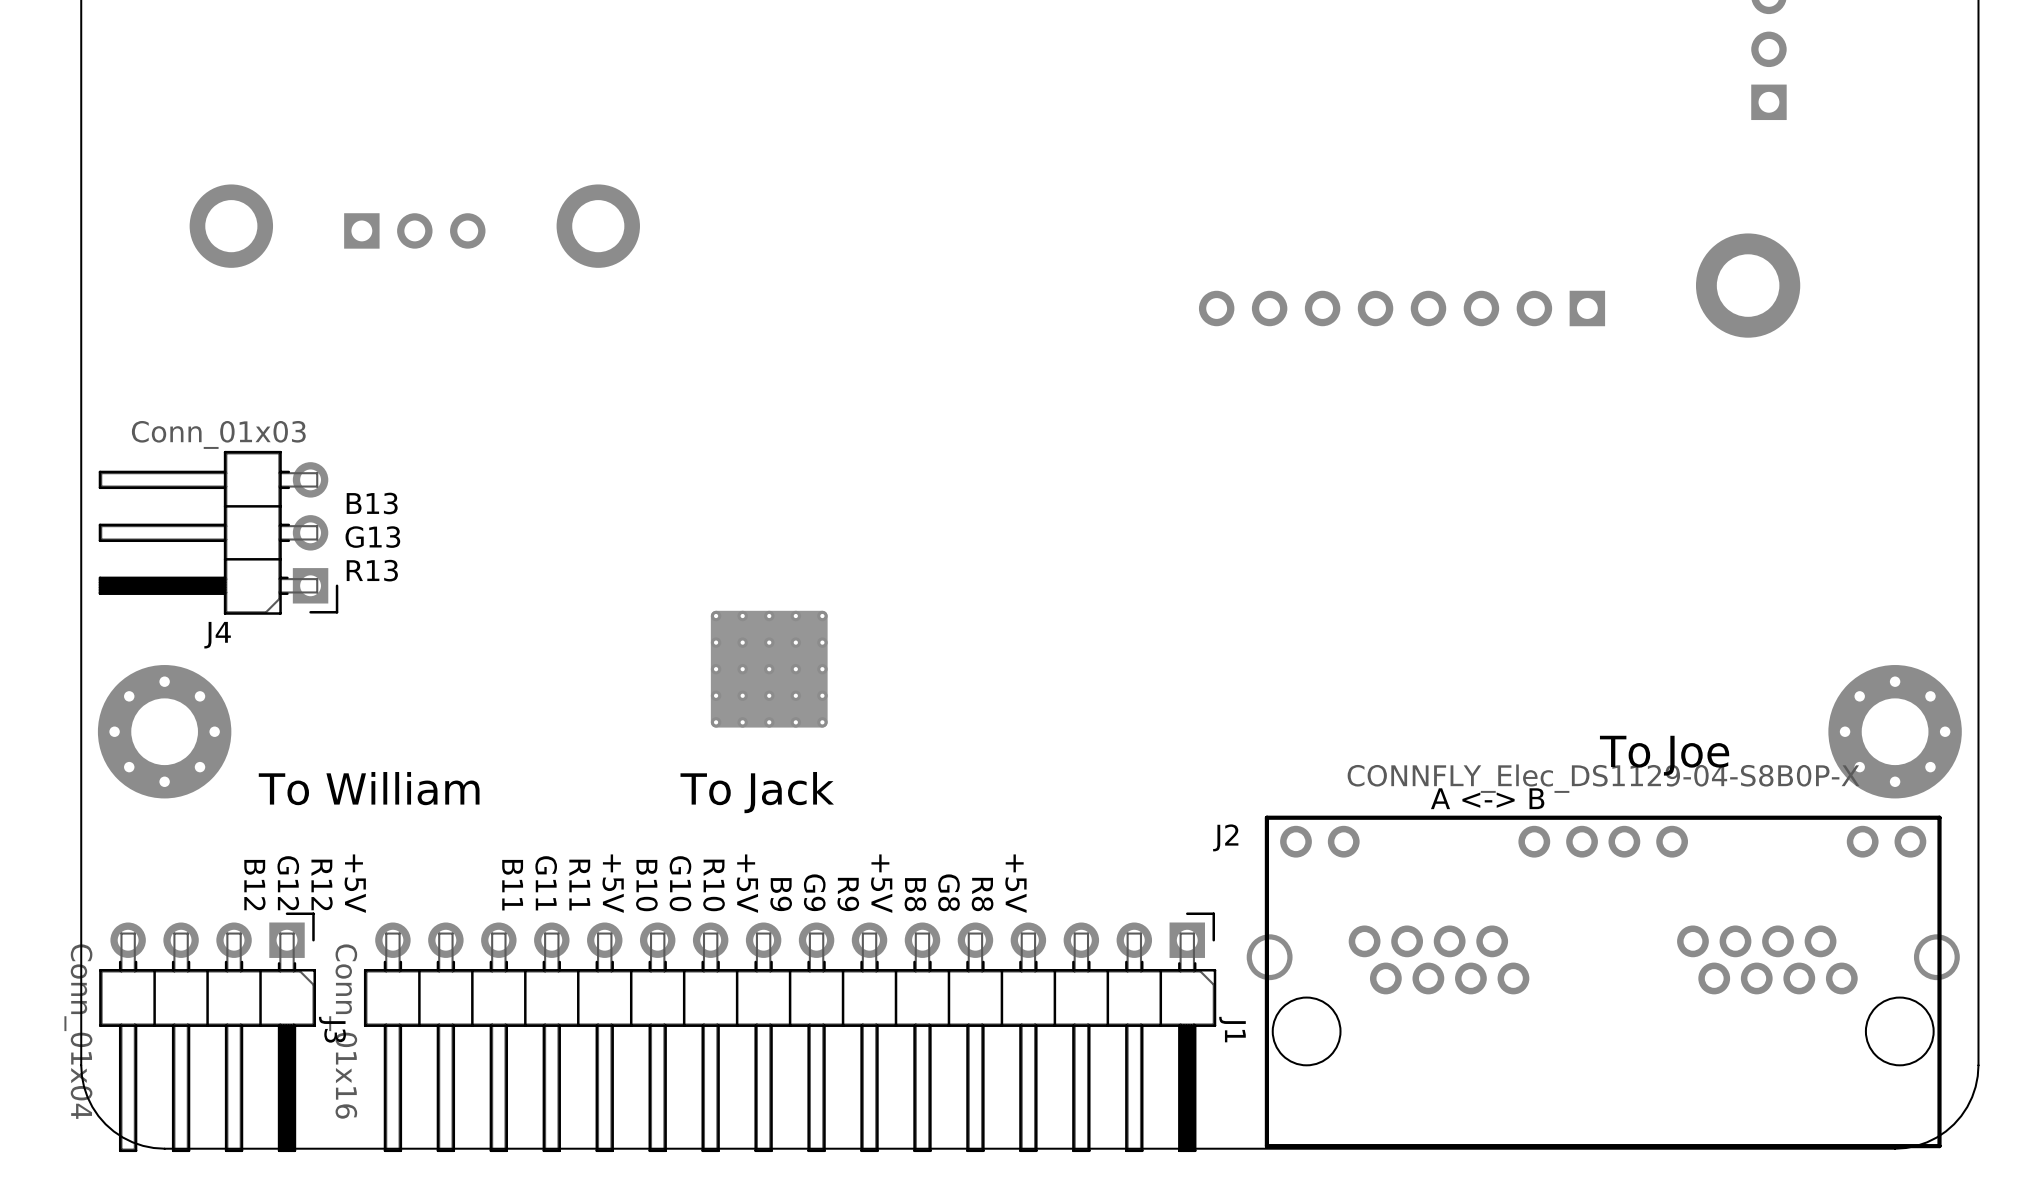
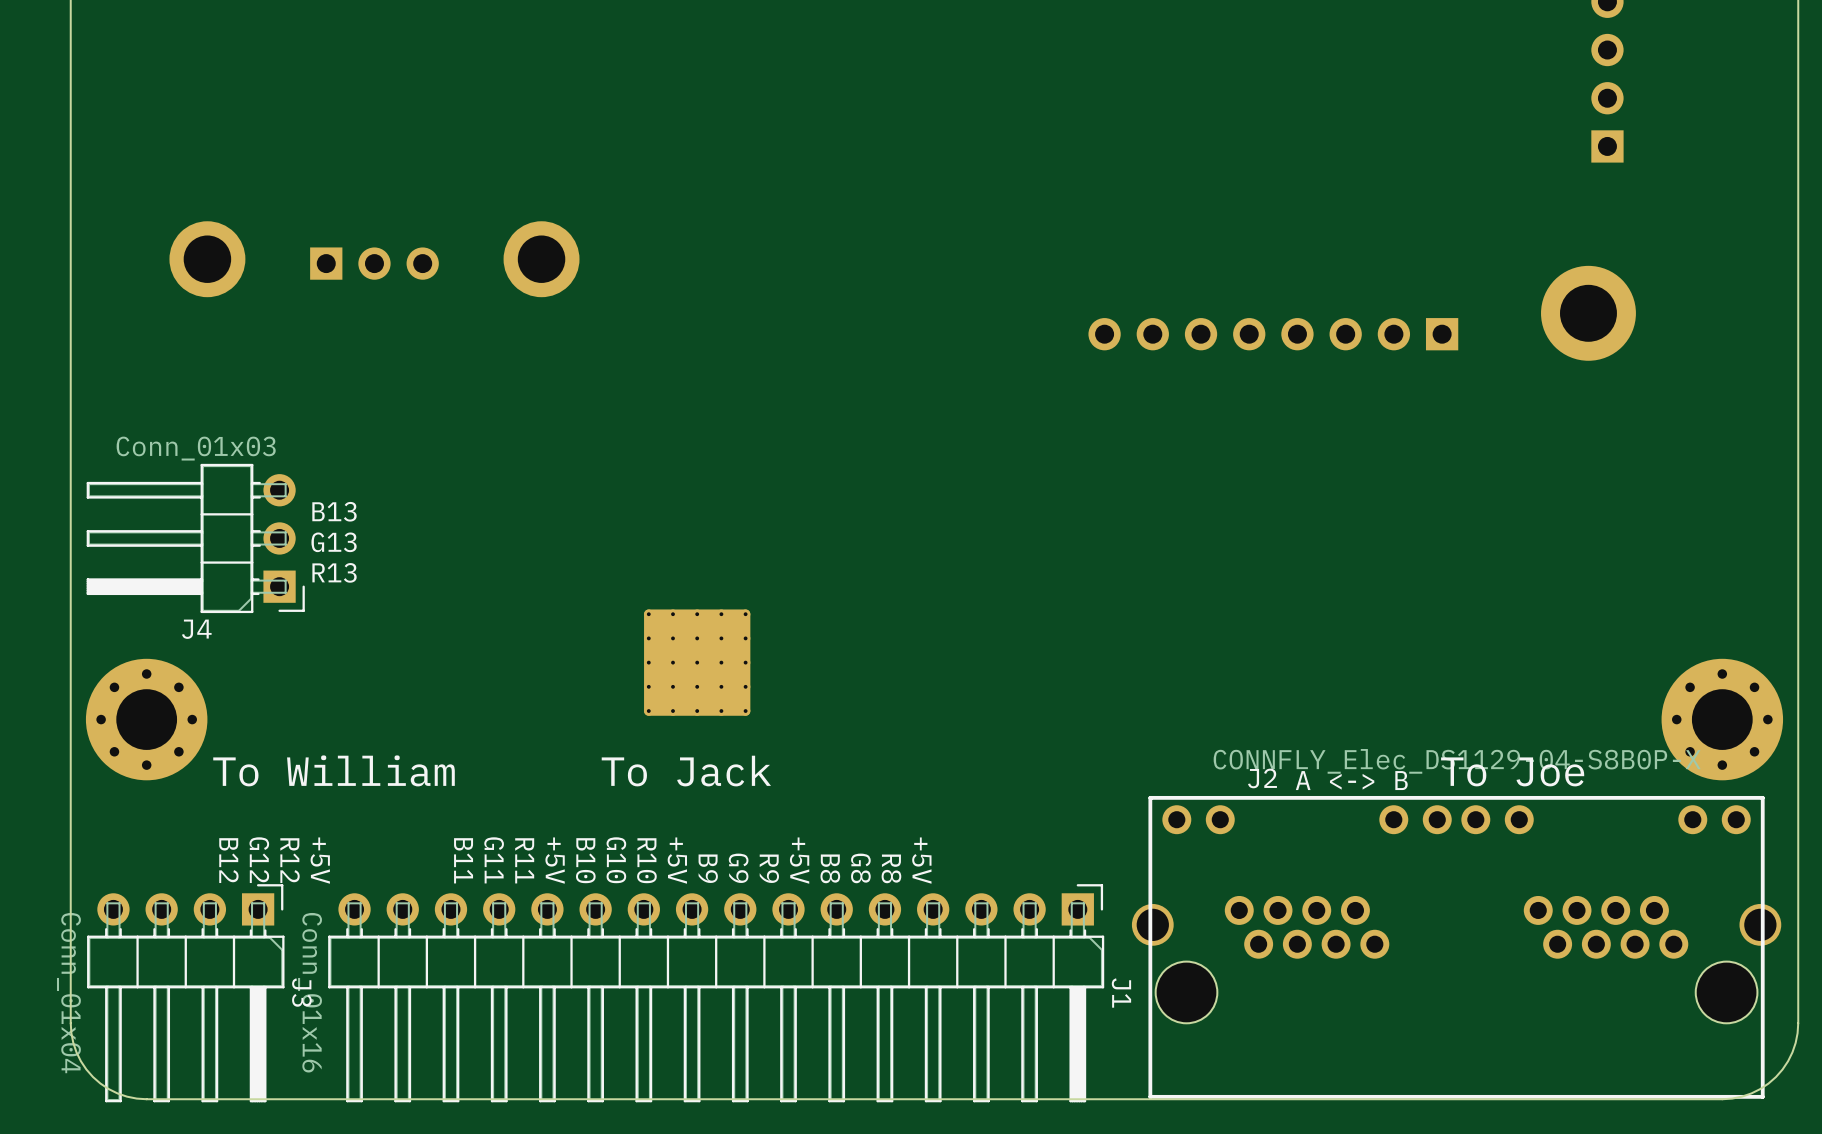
text position: To Joe (1664, 755) -> To Joe (1512, 771)
J2 name position: J2 (1225, 837) -> J2 (1262, 778)

